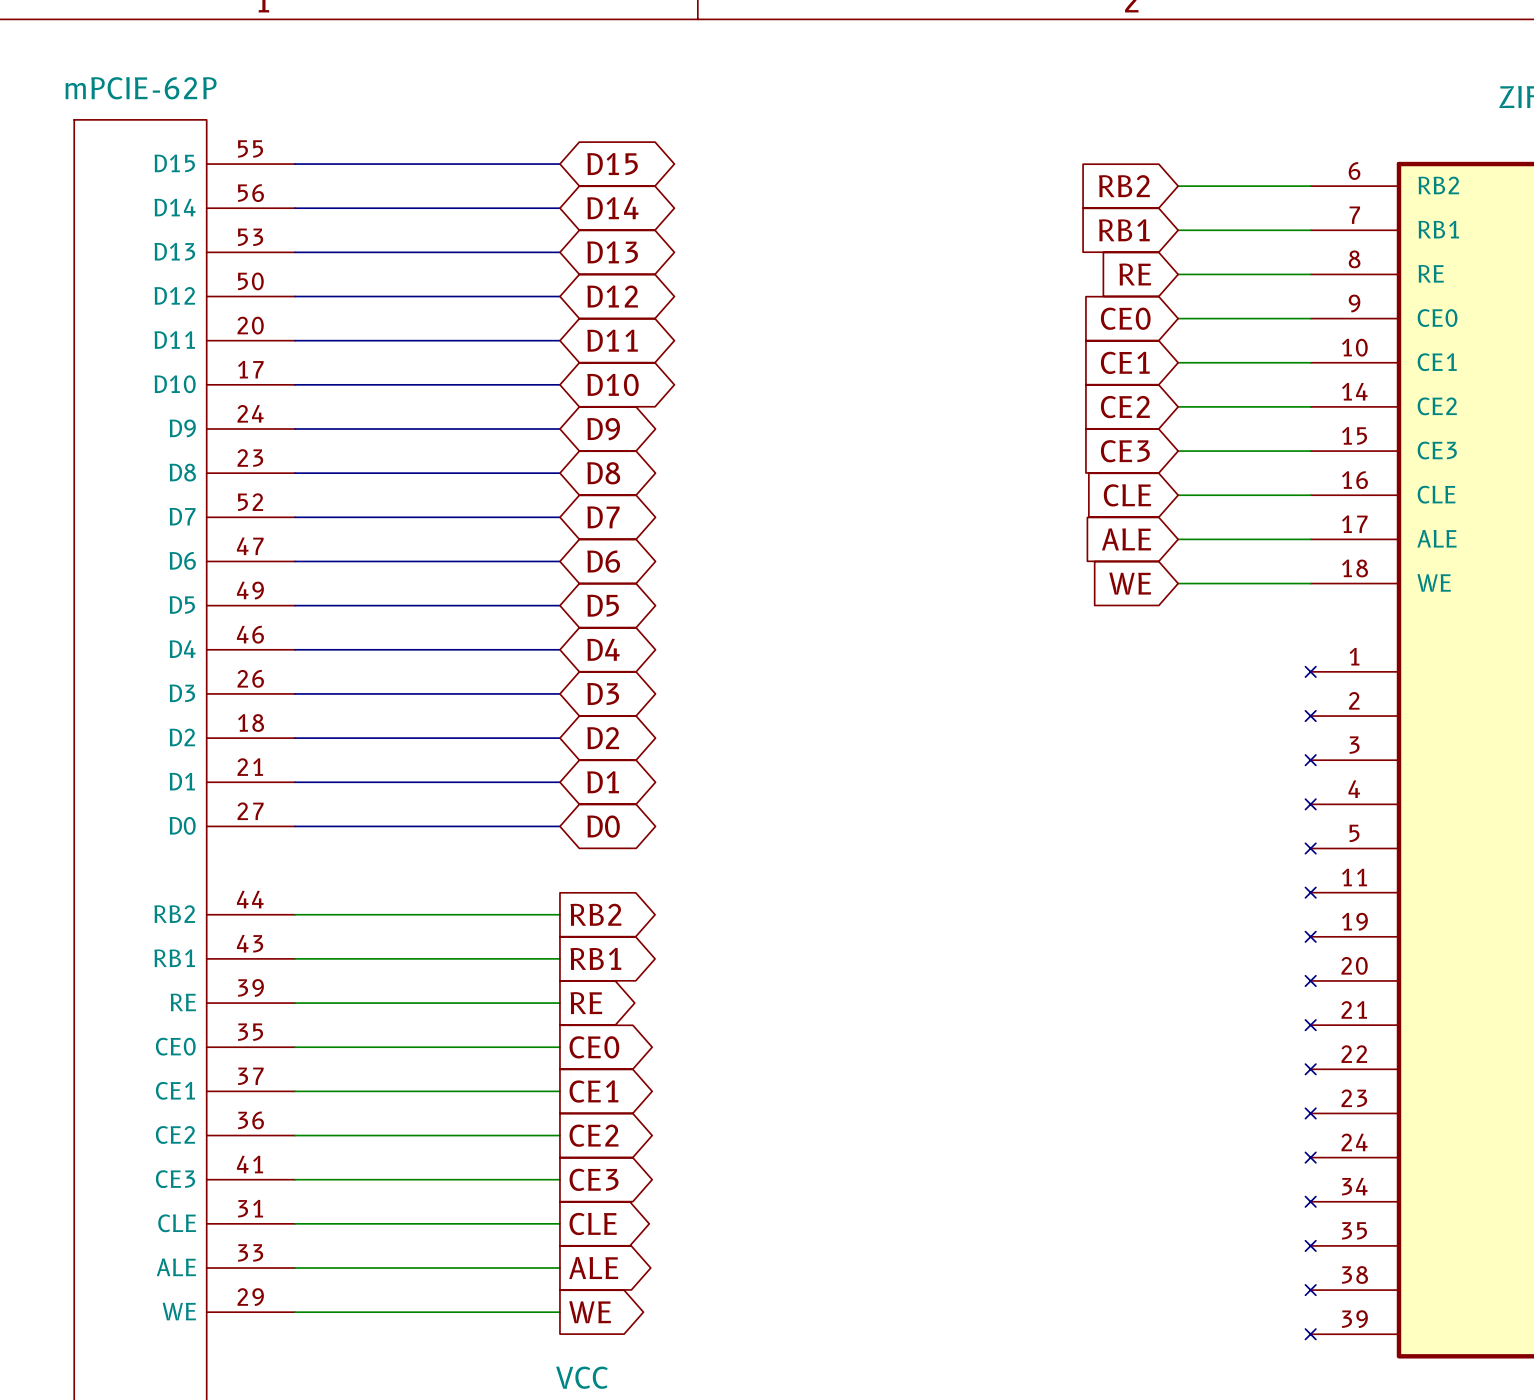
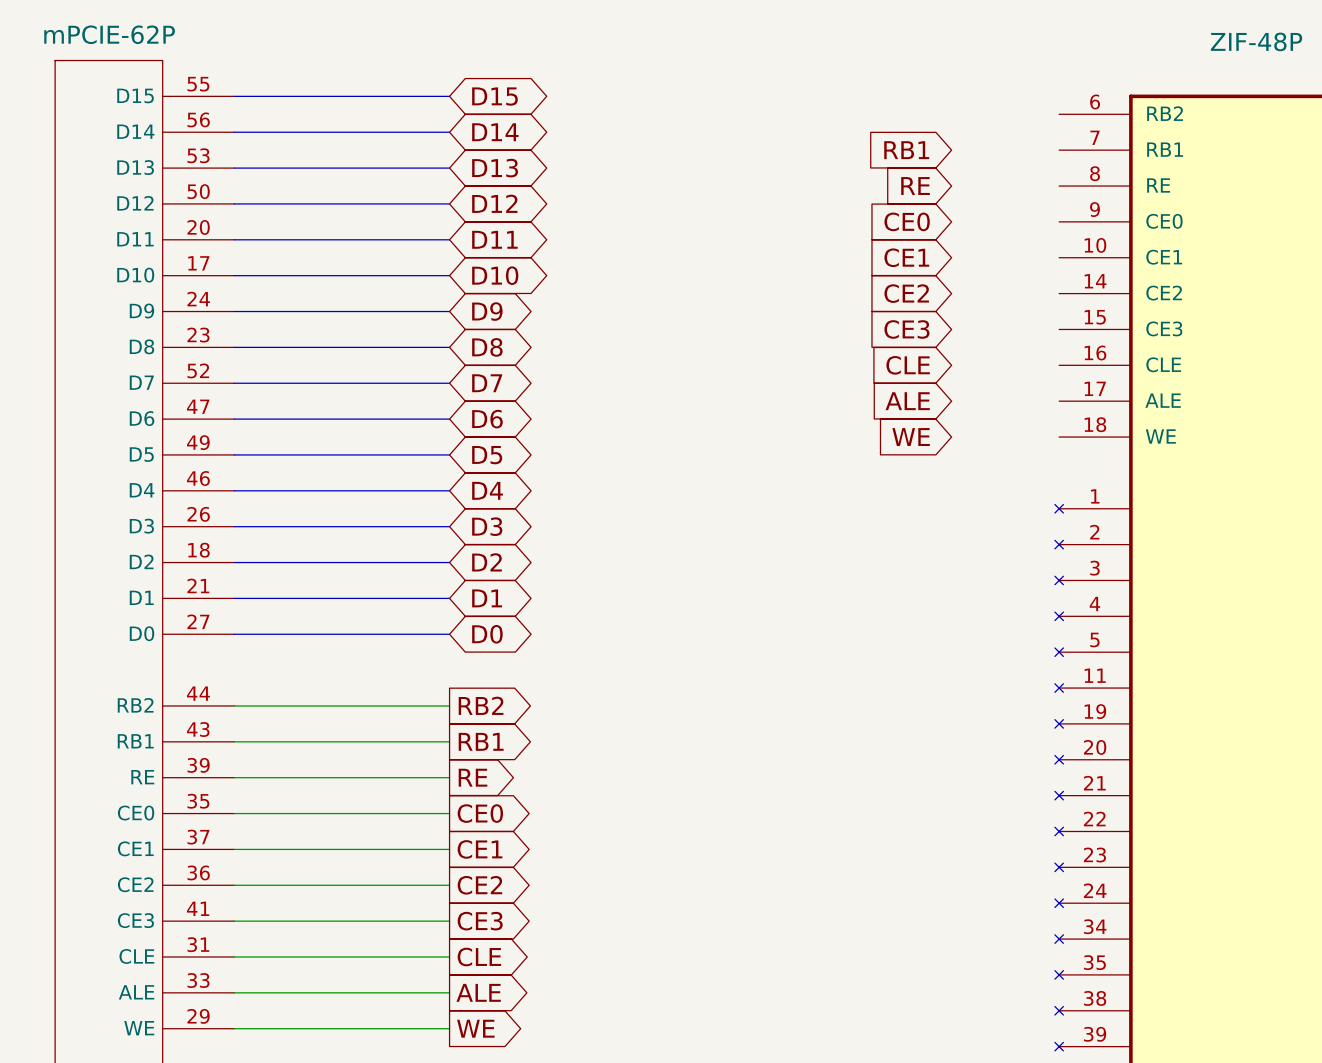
global label: RB2 (1124, 186) -> none
wire: (1178, 186) (1310, 186) -> none
wire: (1178, 230) (1310, 230) -> none
wire: (1178, 274) (1310, 274) -> none
wire: (1178, 318) (1310, 318) -> none
wire: (1178, 362) (1310, 362) -> none
wire: (1178, 406) (1310, 406) -> none
wire: (1178, 451) (1310, 451) -> none
wire: (1178, 495) (1310, 495) -> none
wire: (1178, 539) (1310, 539) -> none
wire: (1178, 583) (1310, 583) -> none

